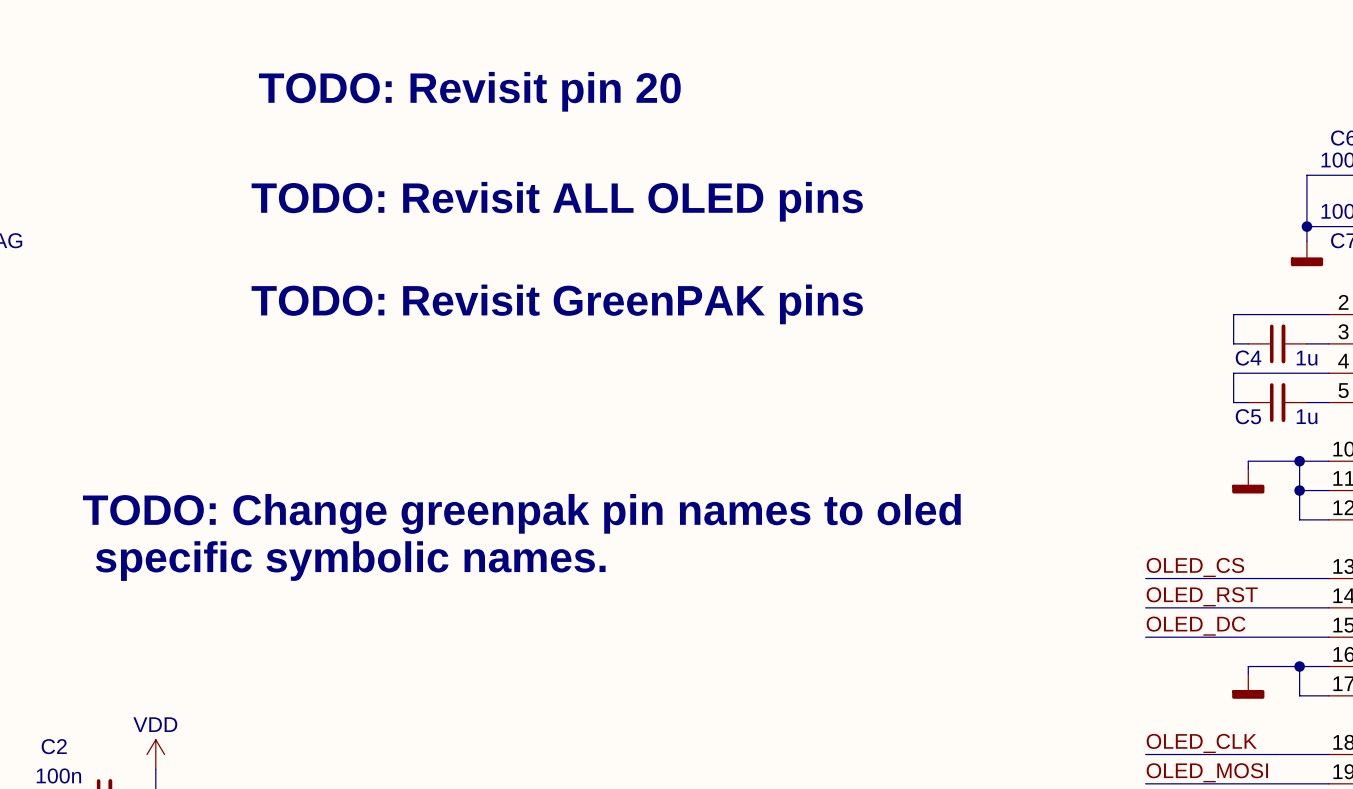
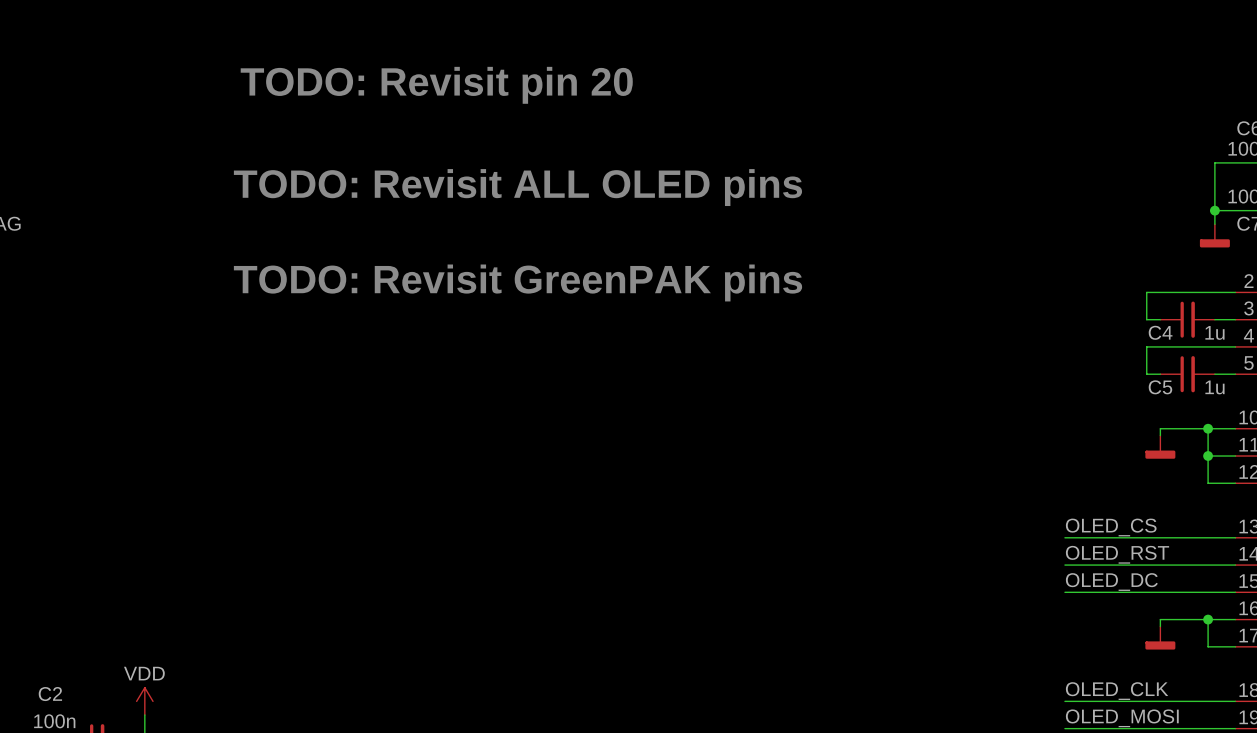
text: TODO: Change greenpak pin names to oled (521, 513) -> none
text: specific symbolic names. (350, 561) -> none

